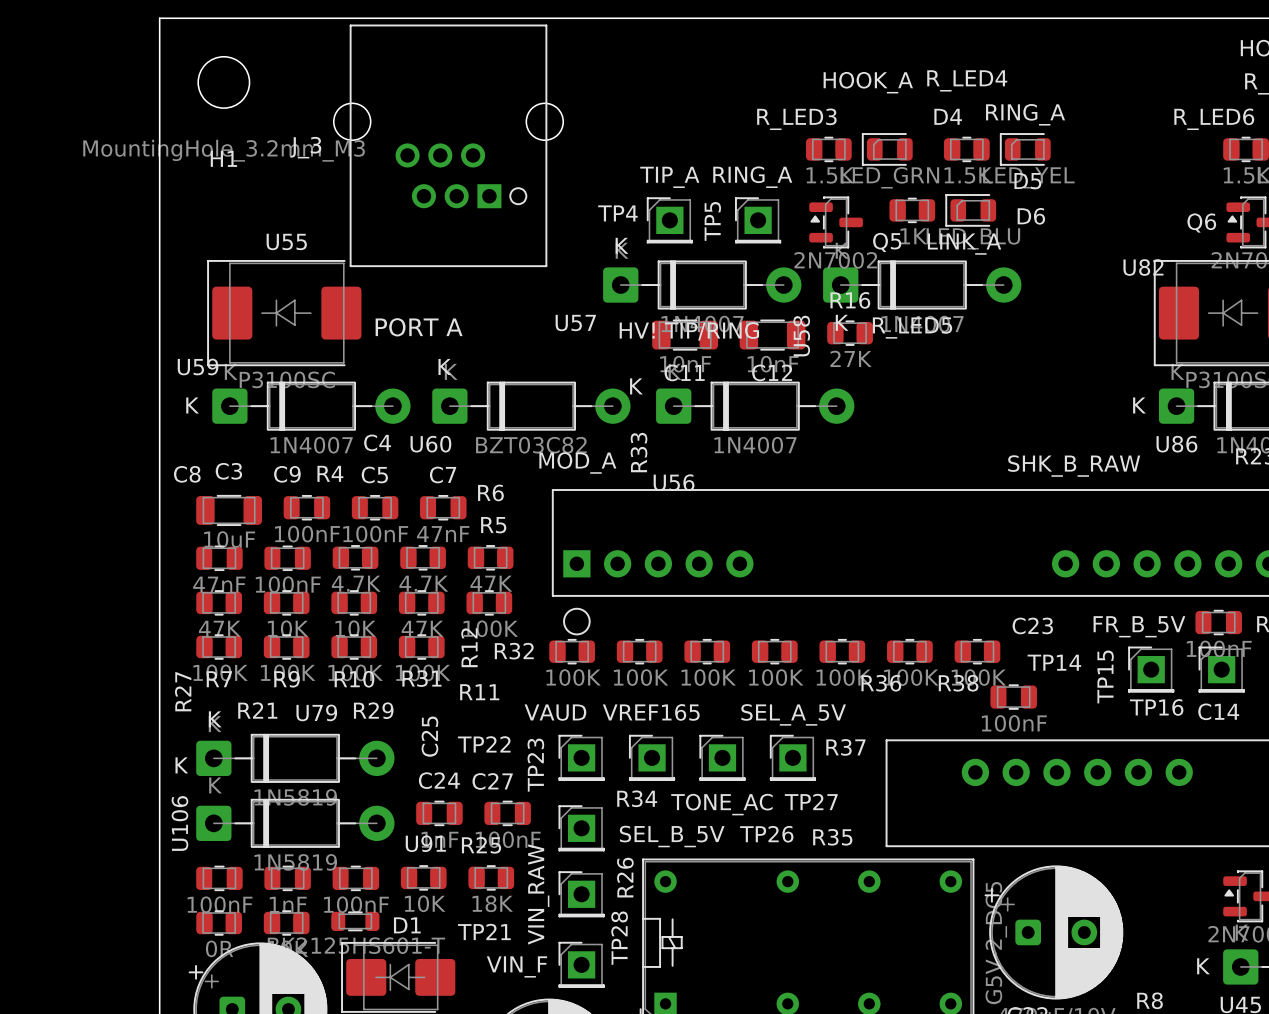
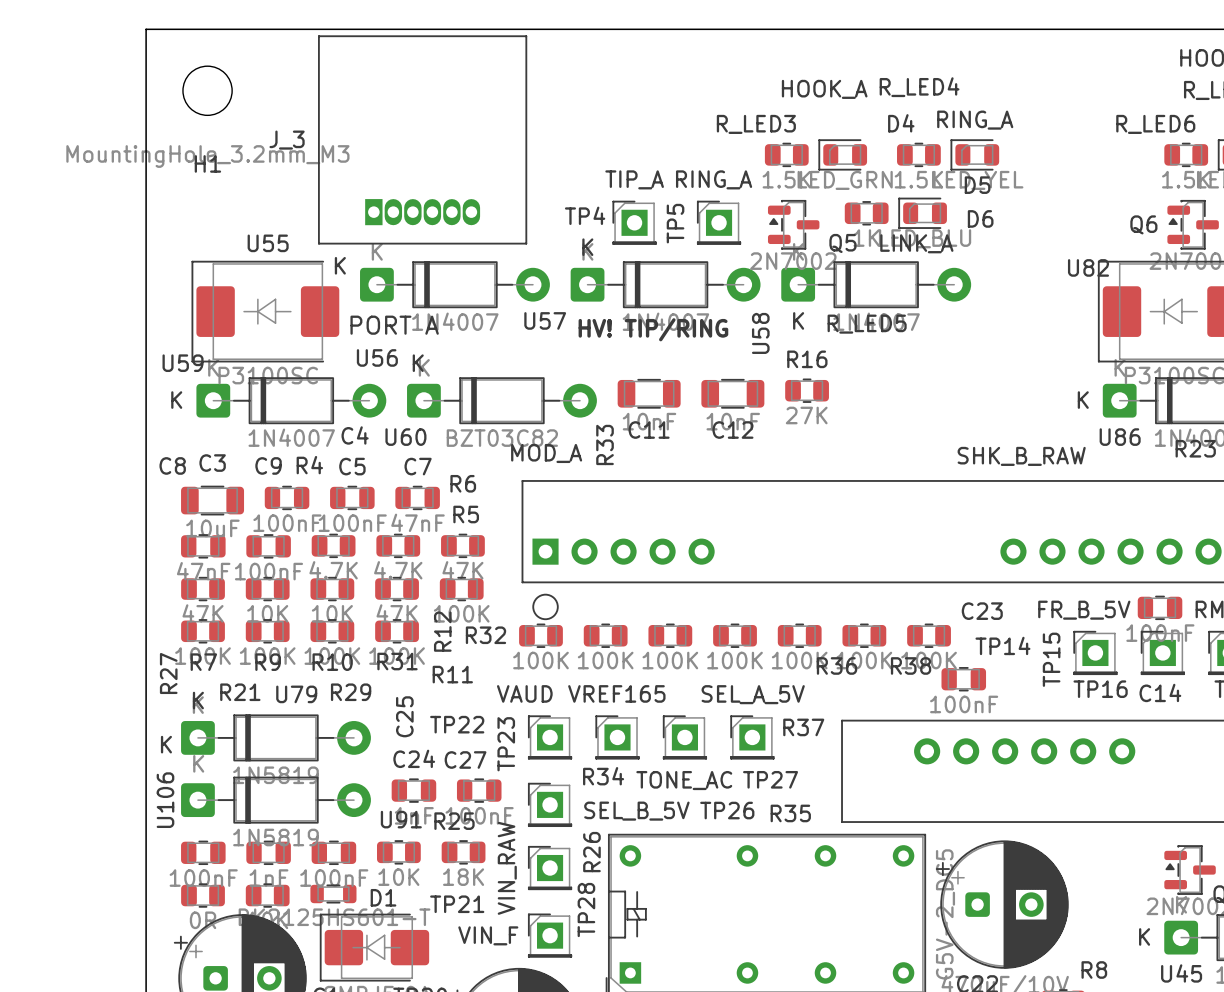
J_3 footprint: [333, 24, 564, 268] -> [318, 35, 528, 245]
R16 position: (850, 333) -> (807, 390)
C11 position: (685, 335) -> (649, 393)
C12 position: (772, 335) -> (732, 393)
U56 position: (755, 406) -> (454, 284)

